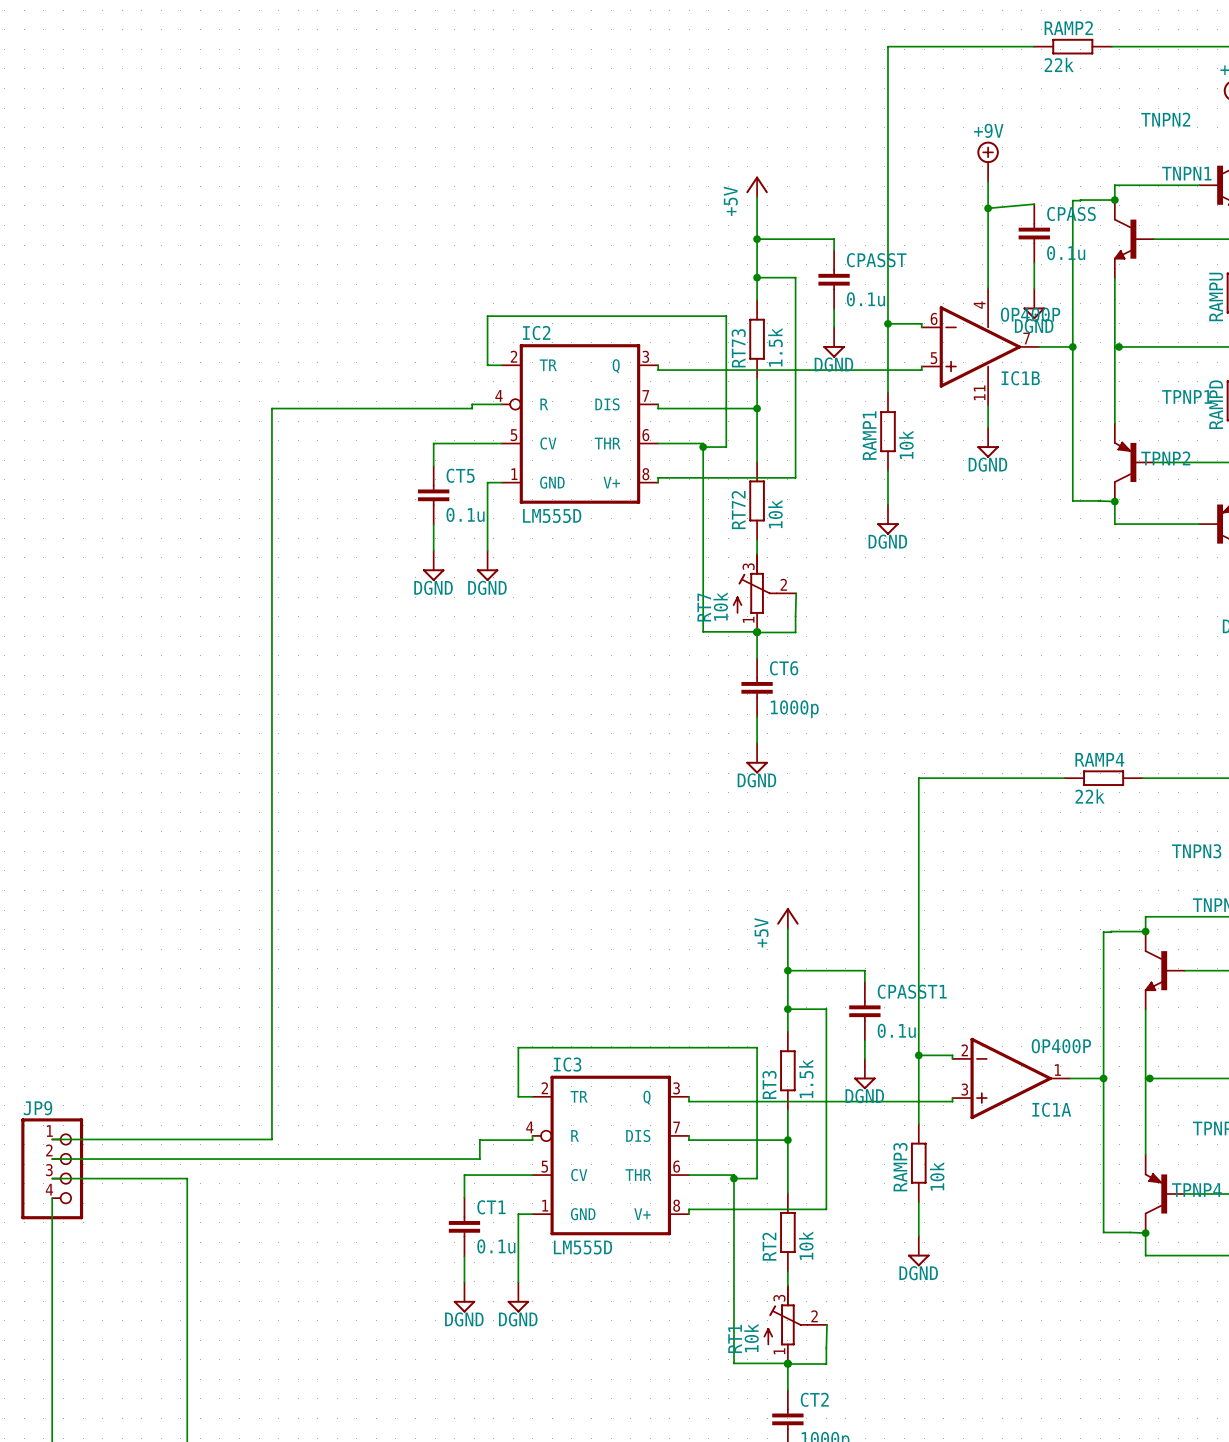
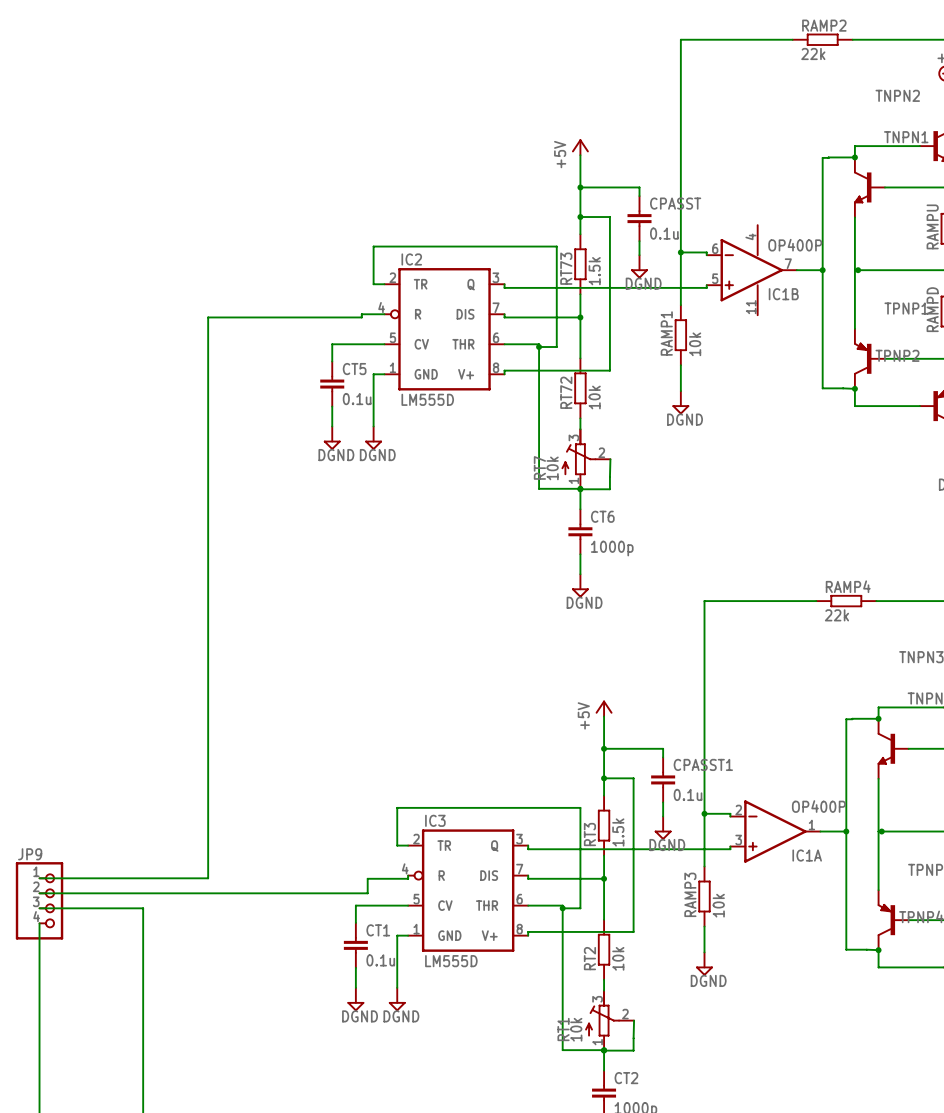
power symbol: +9V (988, 161) -> none
wire: (988, 181) (988, 288) -> none
wire: (1034, 204) (988, 208) -> none
junction: (988, 208) -> none
CPASS: 0.1u (1034, 233) -> none
wire: (1034, 262) (1034, 288) -> none
power symbol: DGND (1034, 304) -> none
wire: (988, 405) (988, 427) -> none
power symbol: DGND (988, 442) -> none

